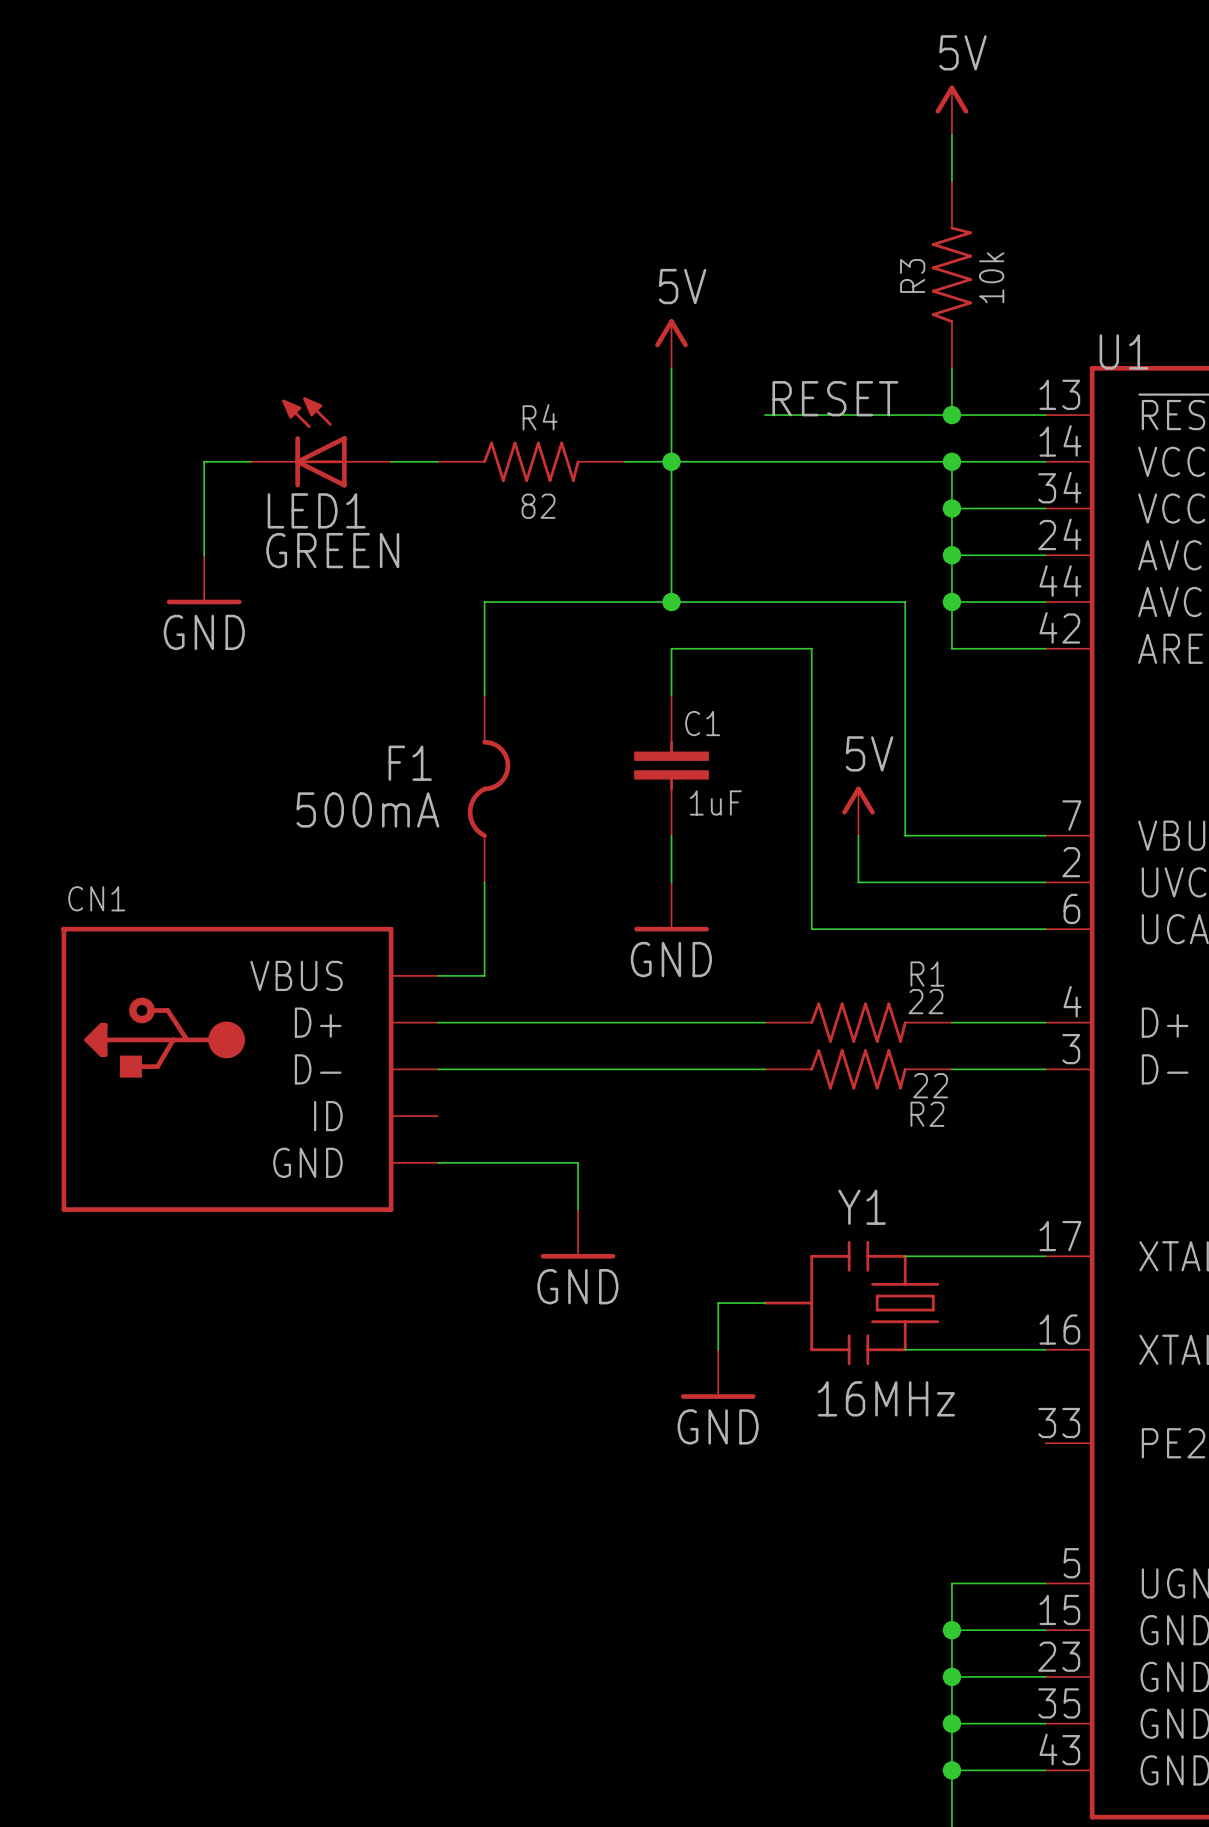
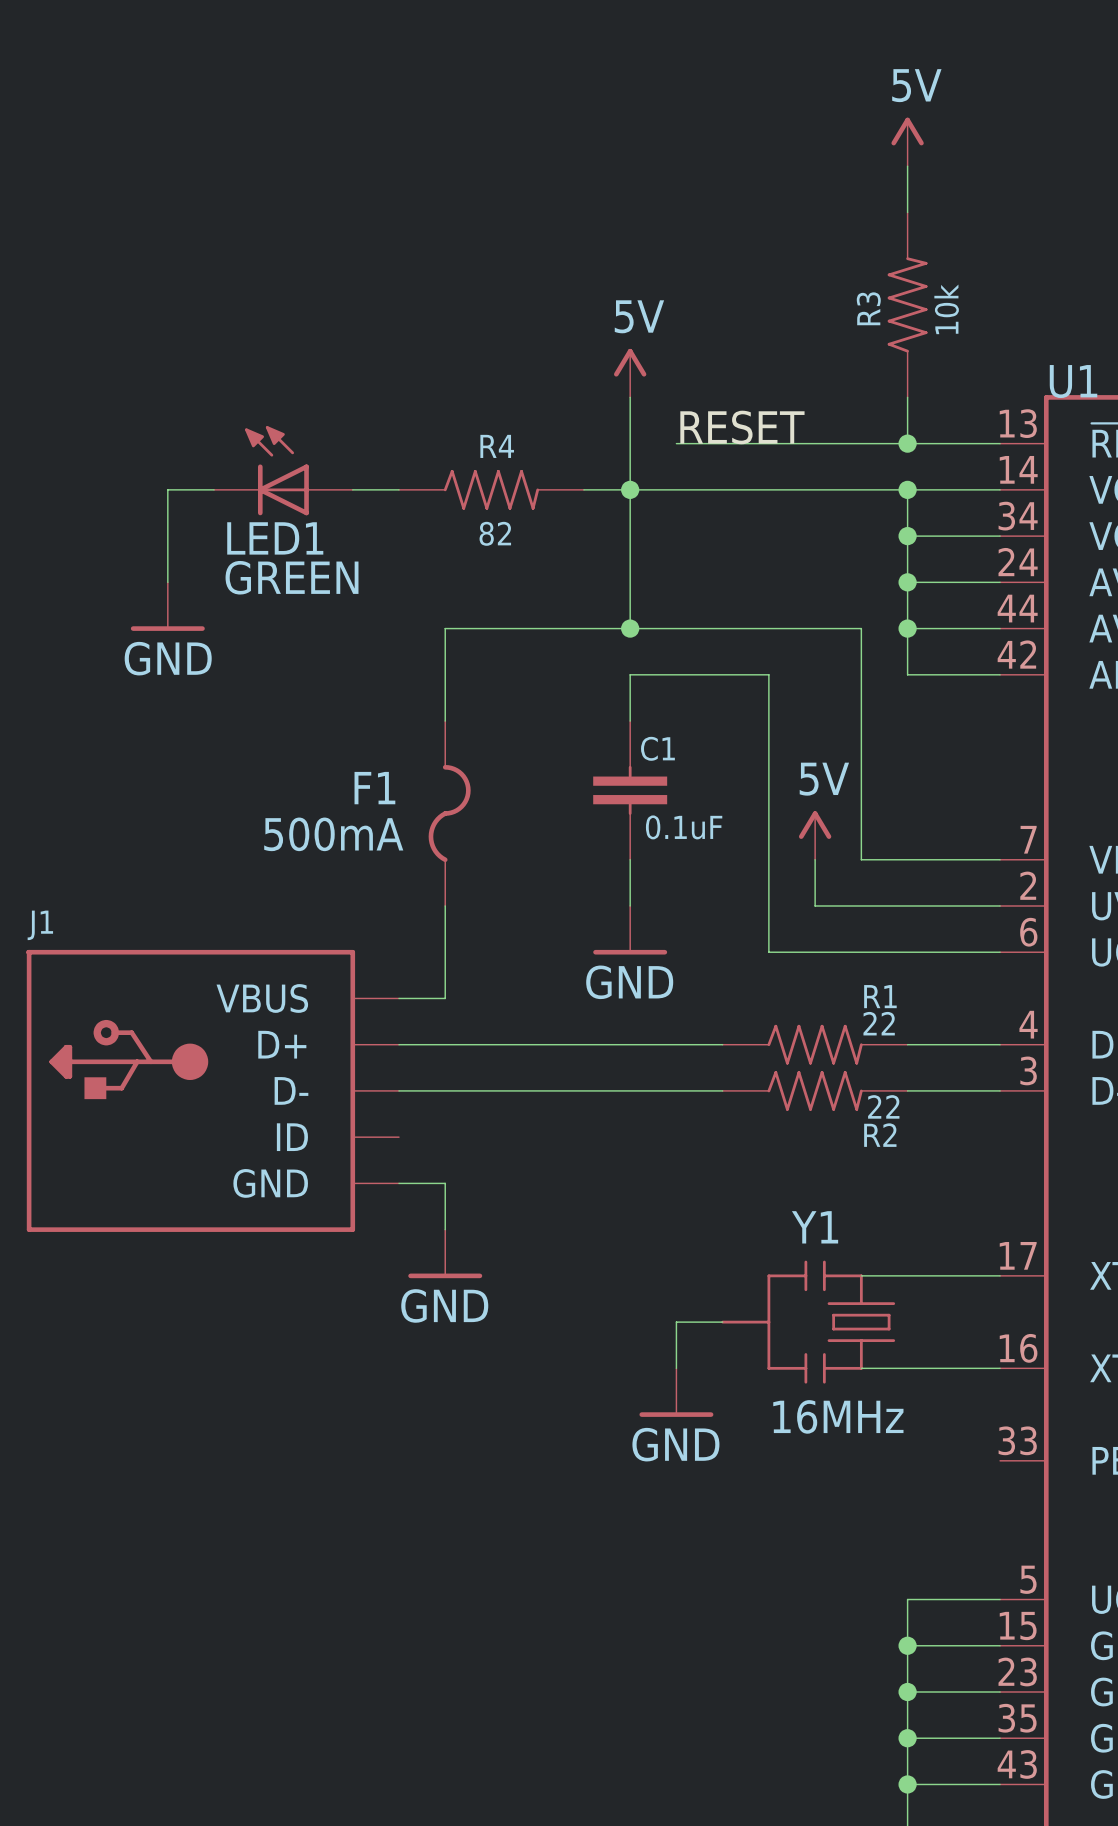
label position: RESET (835, 398) -> RESET (742, 427)
wire: none -> (676, 443) (722, 443)
C1 value: 1uF (715, 802) -> 0.1uF (684, 827)
CN1 name: CN1 (96, 898) -> J1 (40, 925)
wire: (484, 1162) (578, 1162) (578, 1209) -> (445, 1183) (445, 1229)
power symbol position: GND (578, 1234) -> GND (445, 1253)

